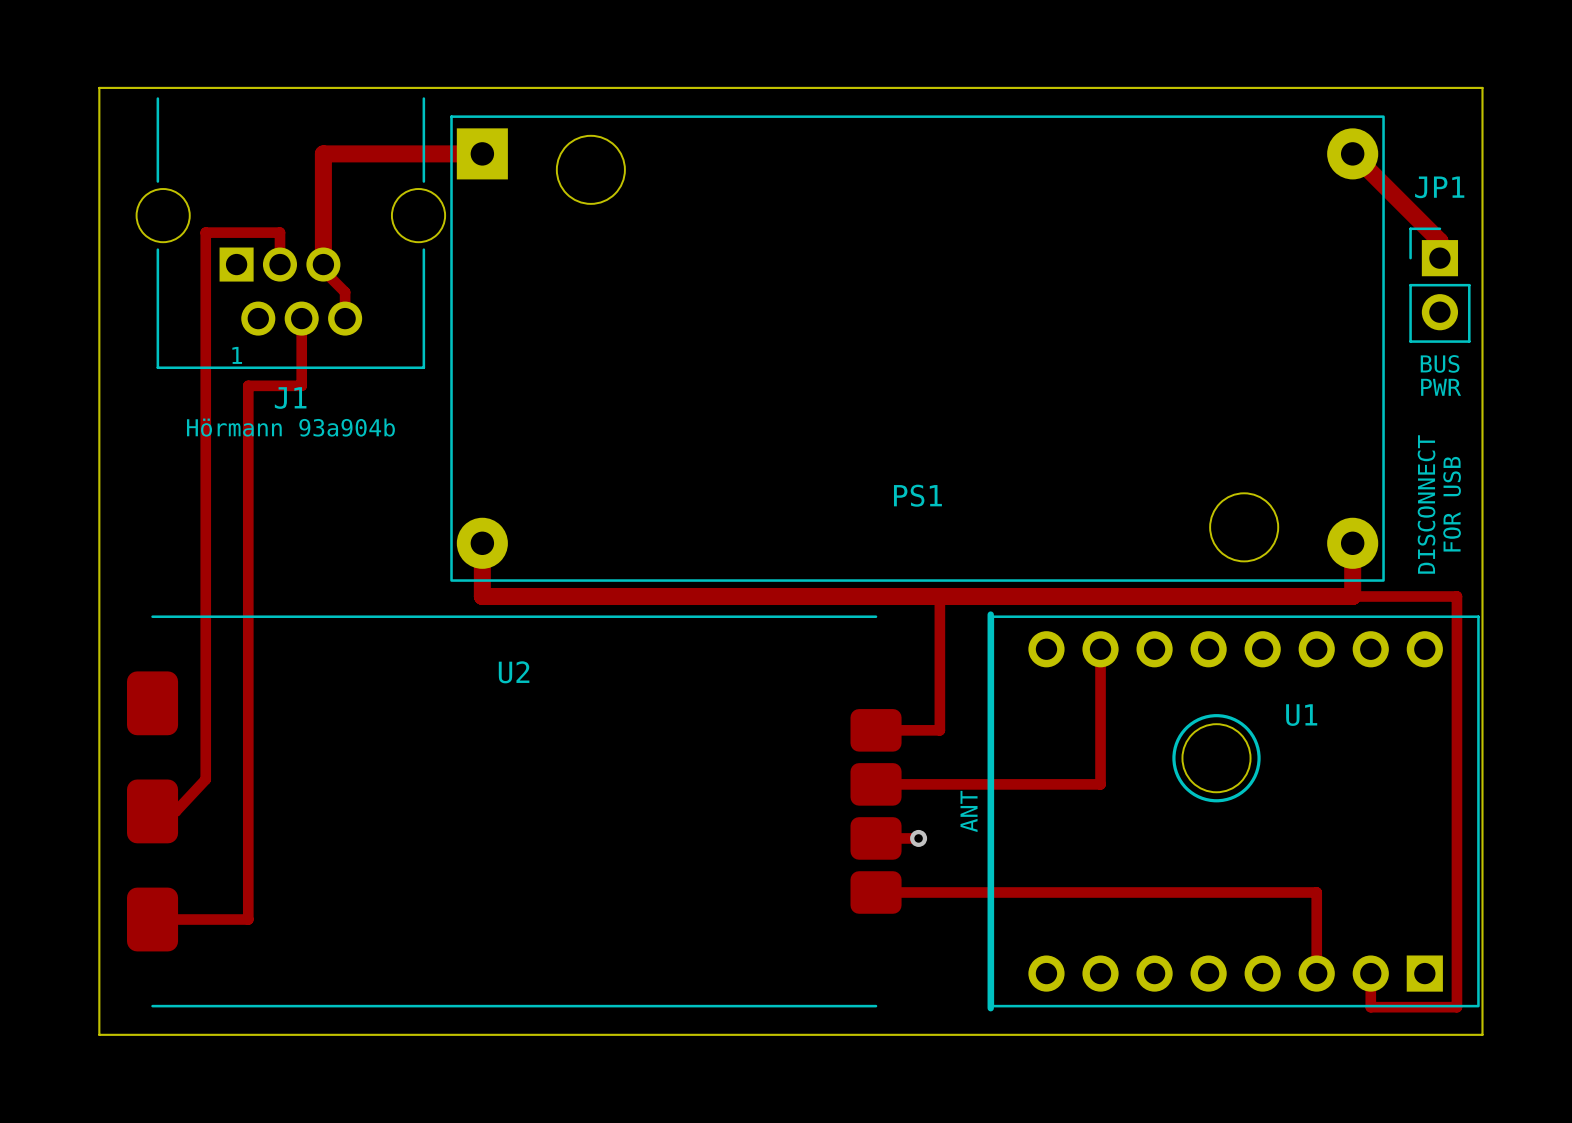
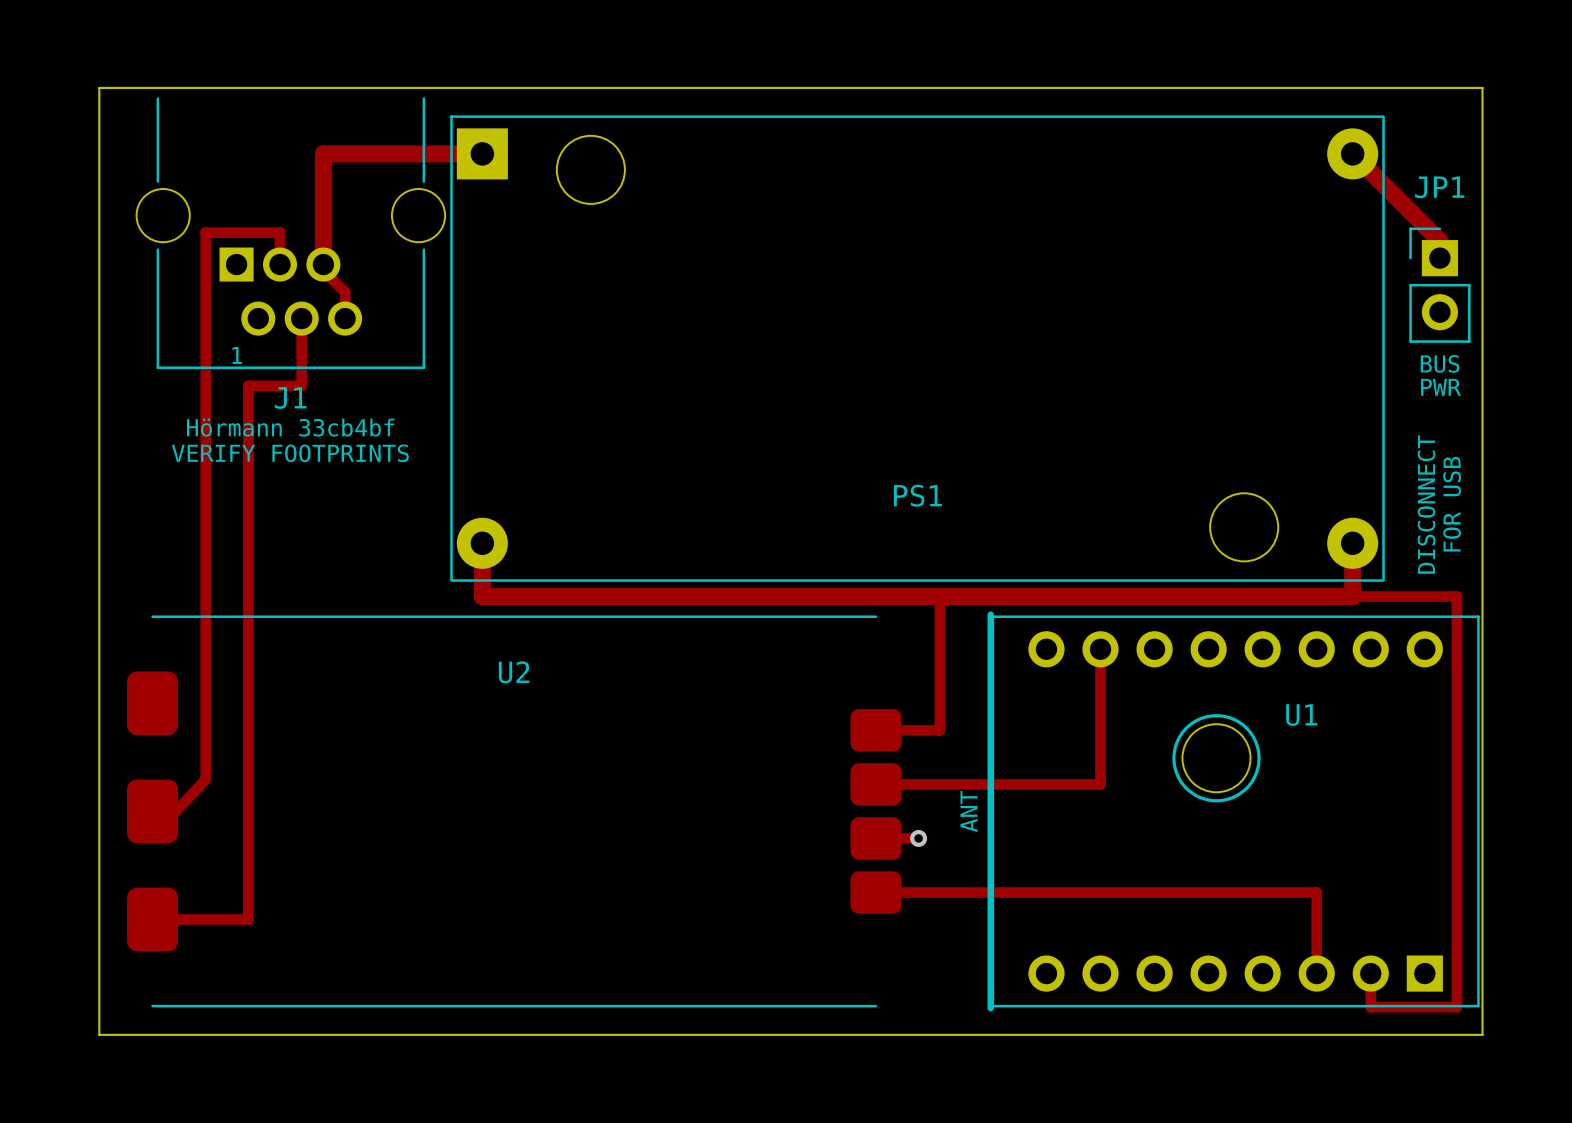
text: Hörmann 93a904b (290, 427) -> Hörmann 33cb4bf (290, 427)
text: none -> VERIFY FOOTPRINTS (290, 453)

